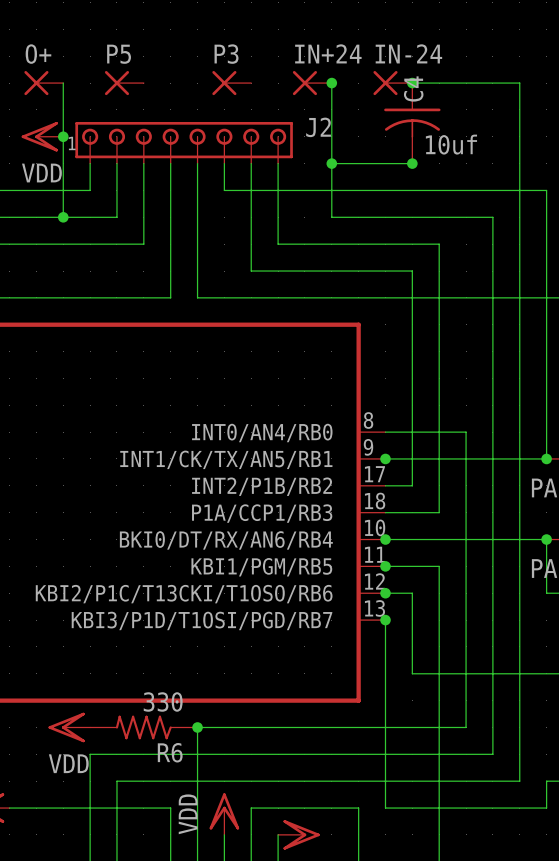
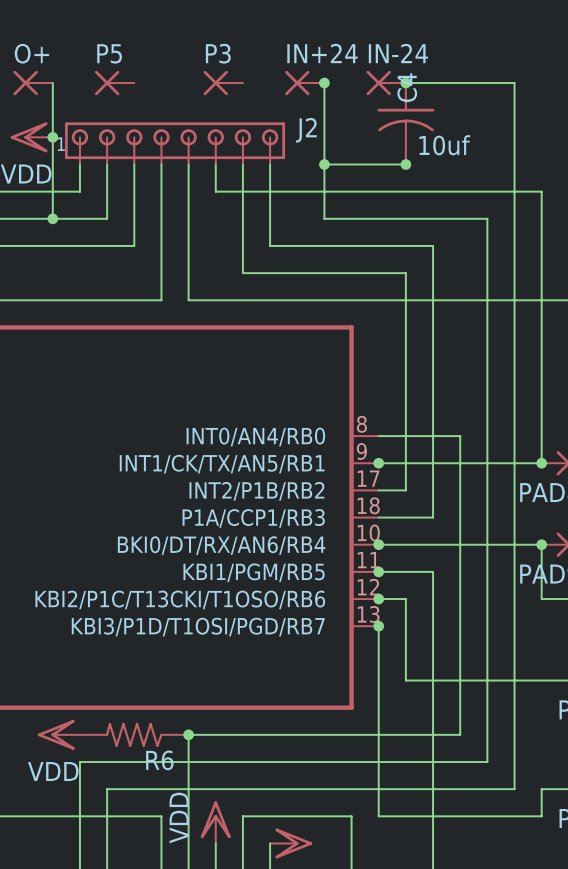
R6 value: 330 (163, 701) -> none

